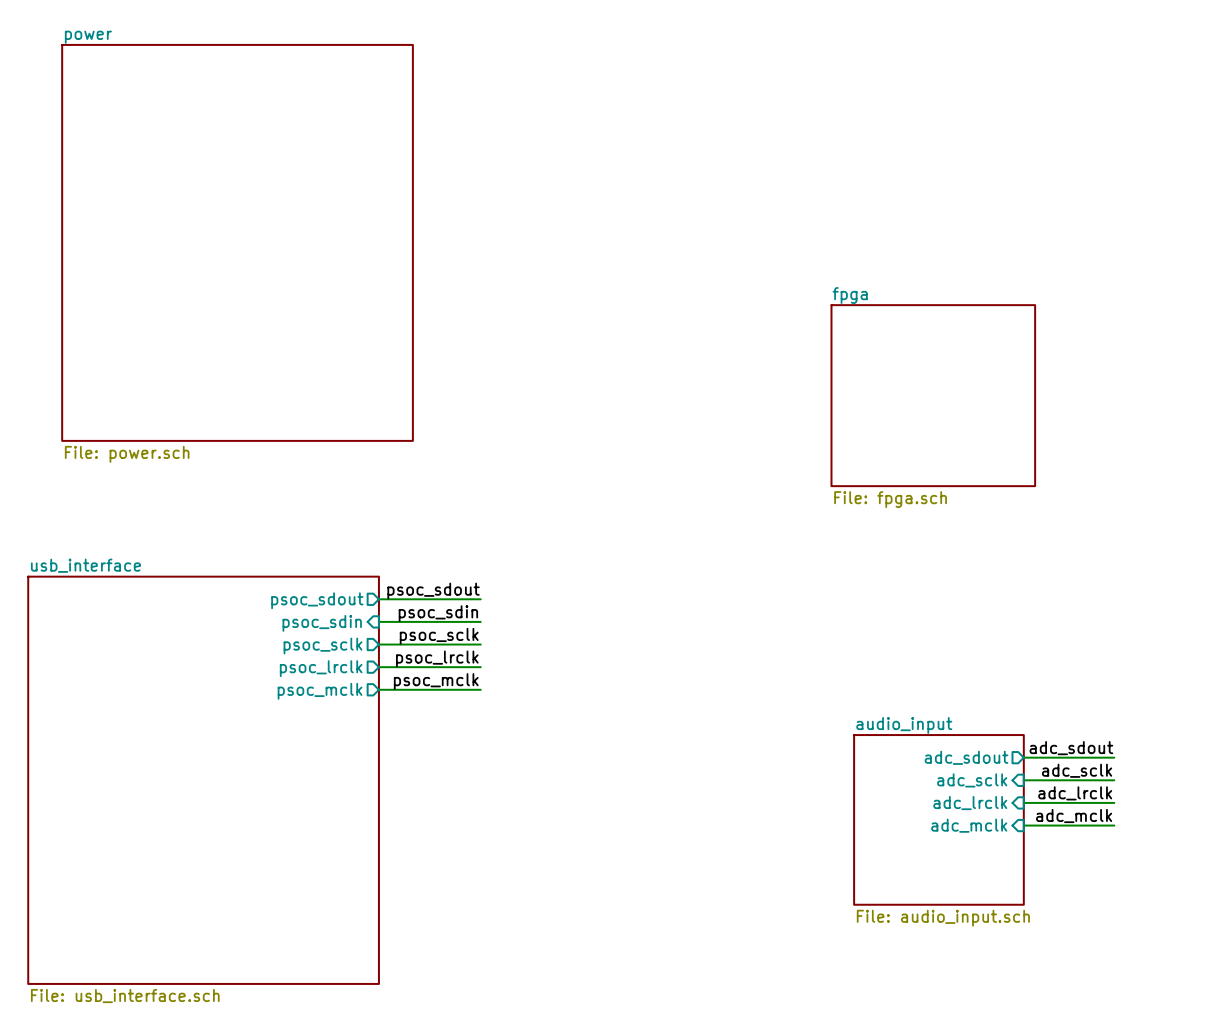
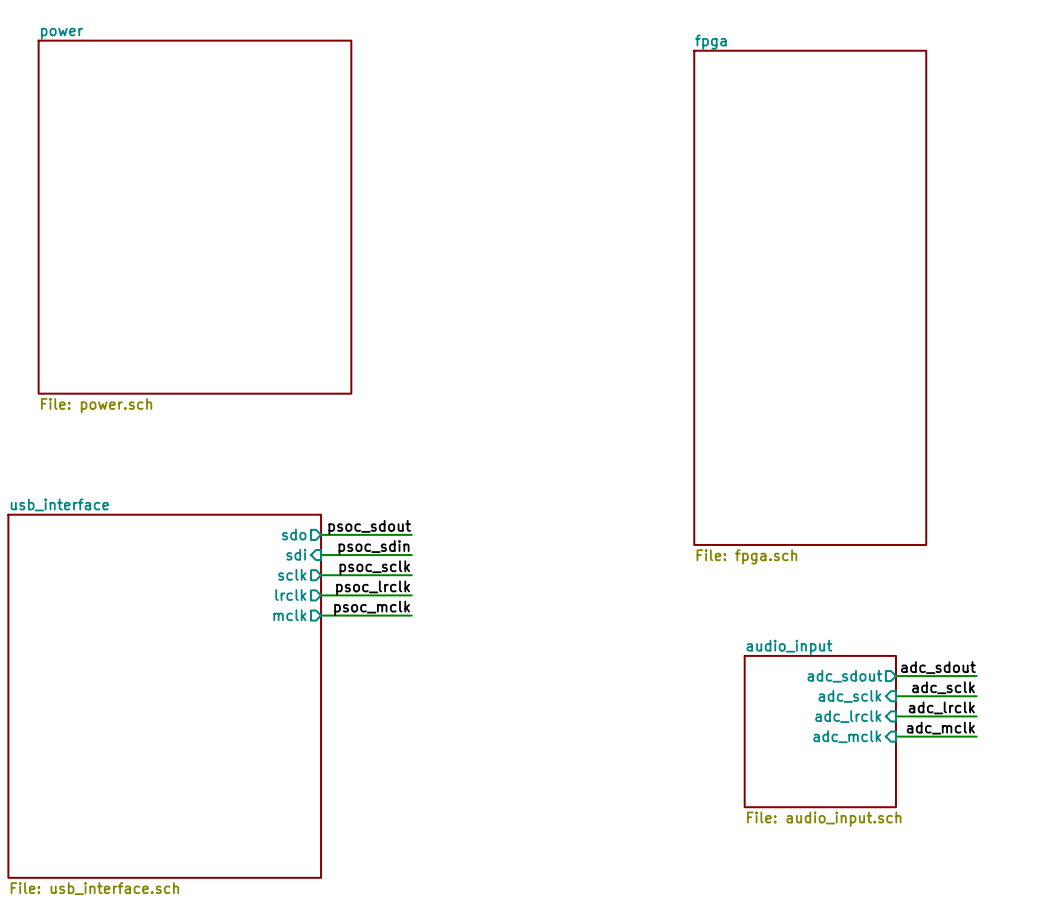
sheet fpga: none -> File: fpga.sch (810, 297)
sheet fpga: File: fpga.sch (933, 395) -> none
sheet pin: psoc_sdout (317, 600) -> sdo (294, 534)
sheet pin: psoc_sdin (322, 623) -> sdi (296, 554)
sheet pin: psoc_sclk (323, 646) -> sclk (292, 574)
sheet pin: psoc_lrclk (321, 668) -> lrclk (290, 595)
sheet pin: psoc_mclk (320, 691) -> mclk (289, 615)

